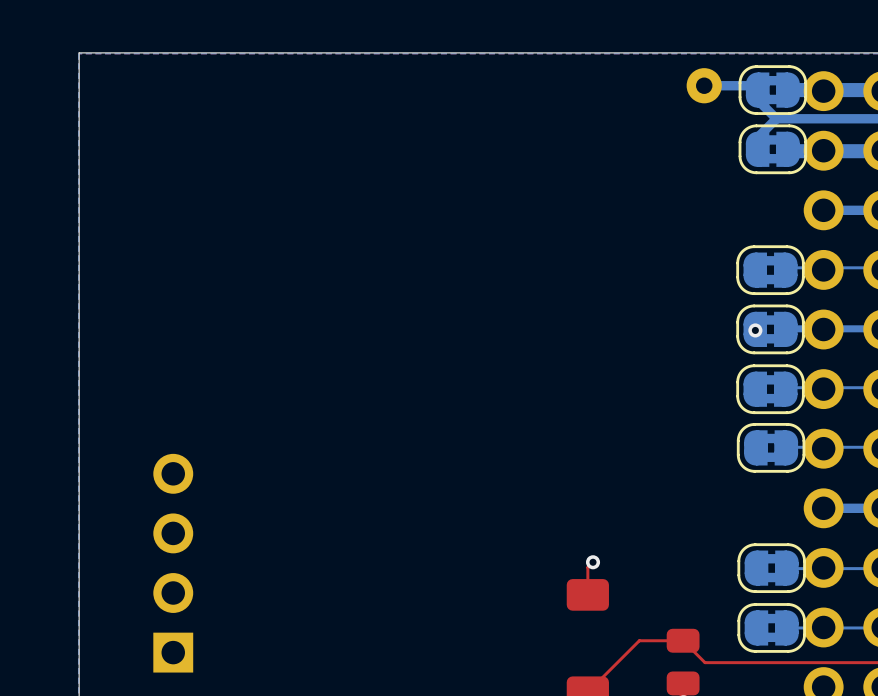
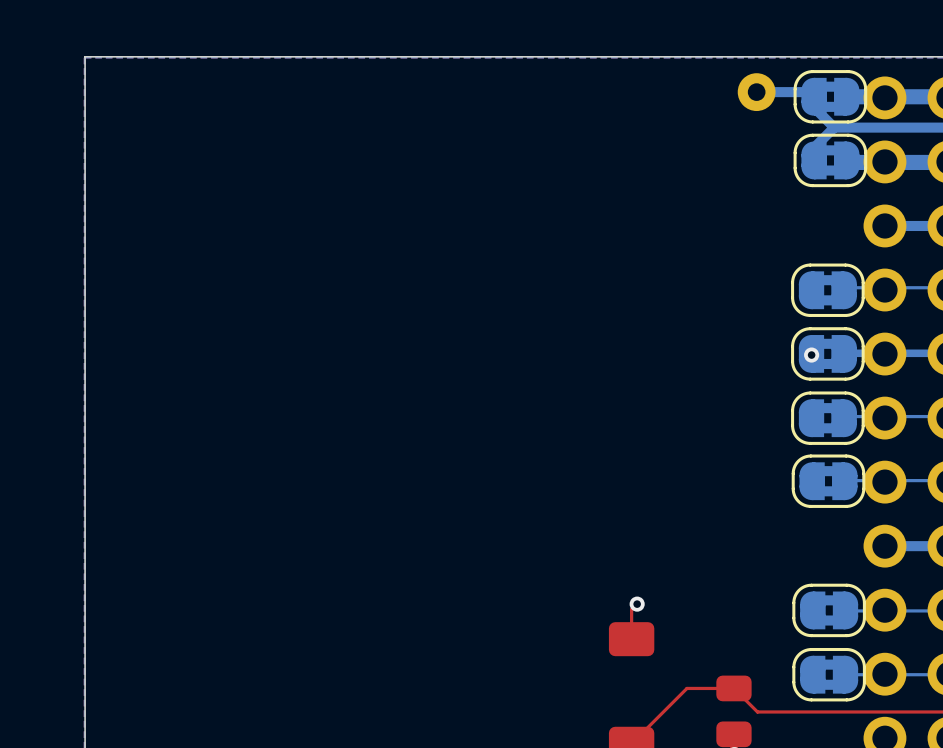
part: (173, 563) -> none

